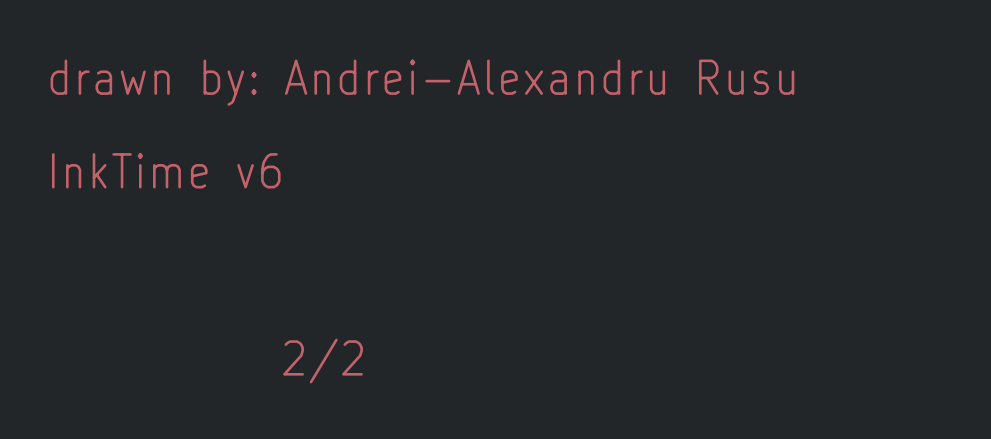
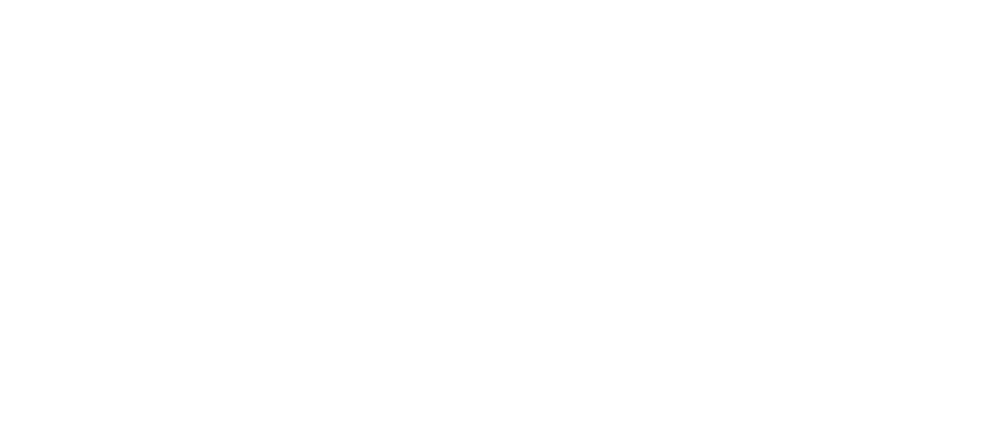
text: drawn by: Andrei-Alexandru Rusu (422, 82) -> none
text: InkTime v6 (166, 170) -> none
text: 2/2 (323, 361) -> none

